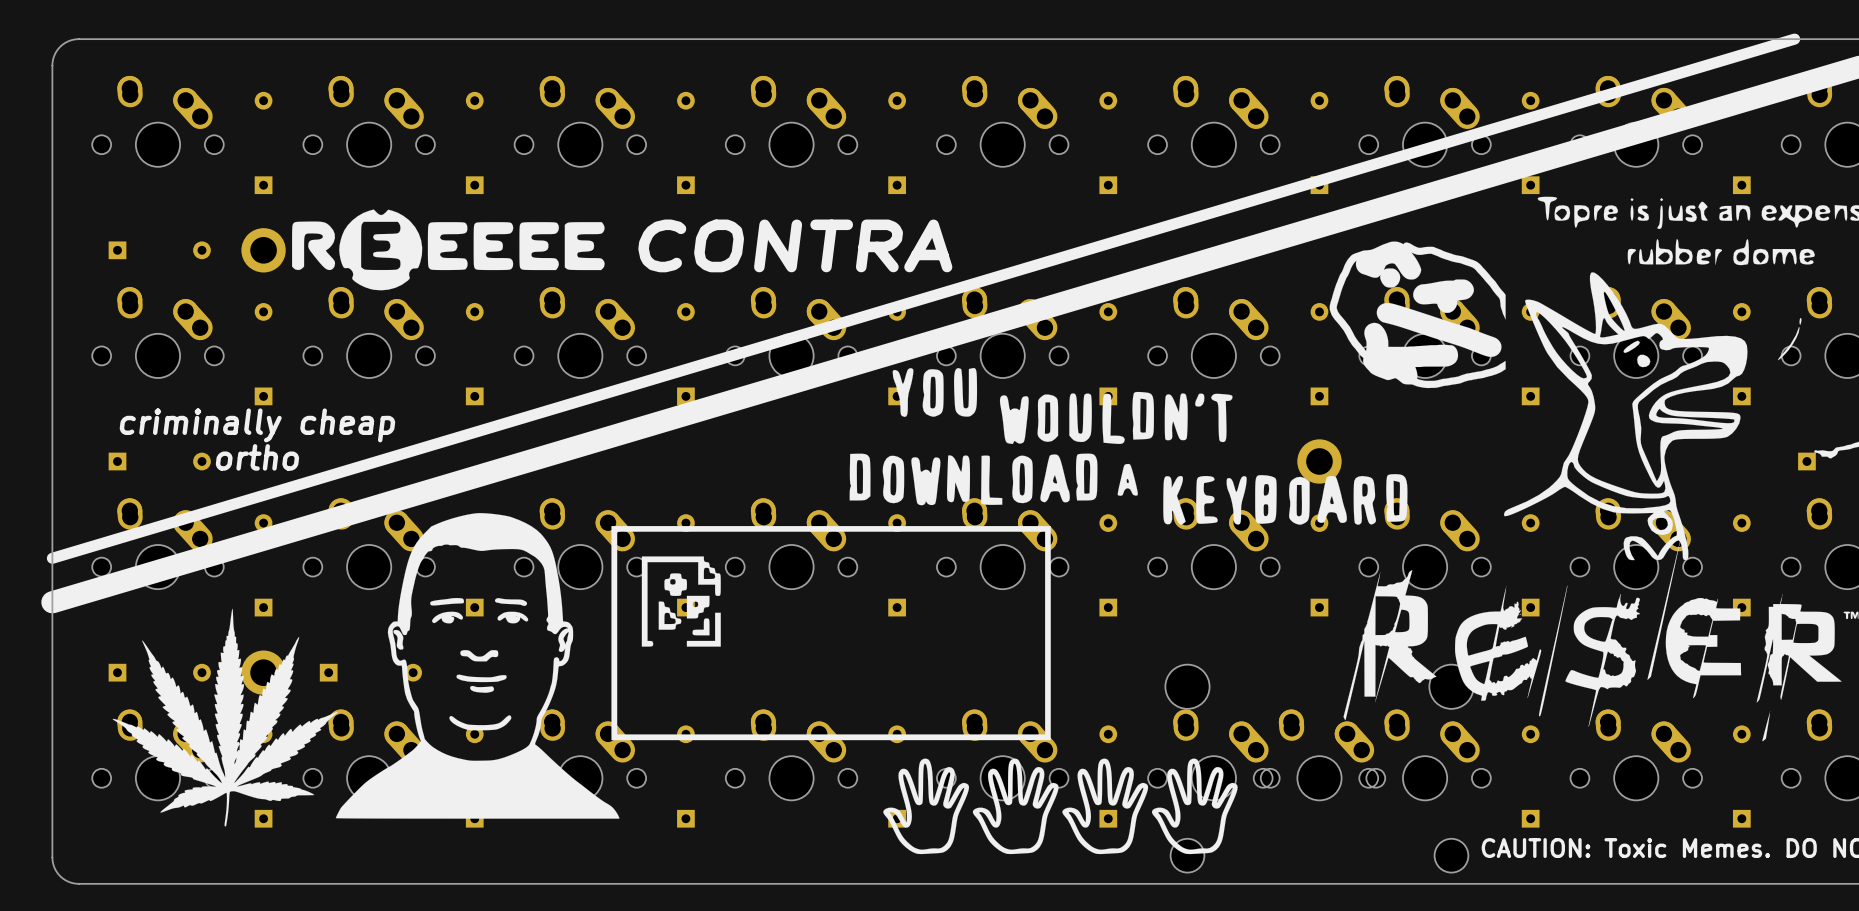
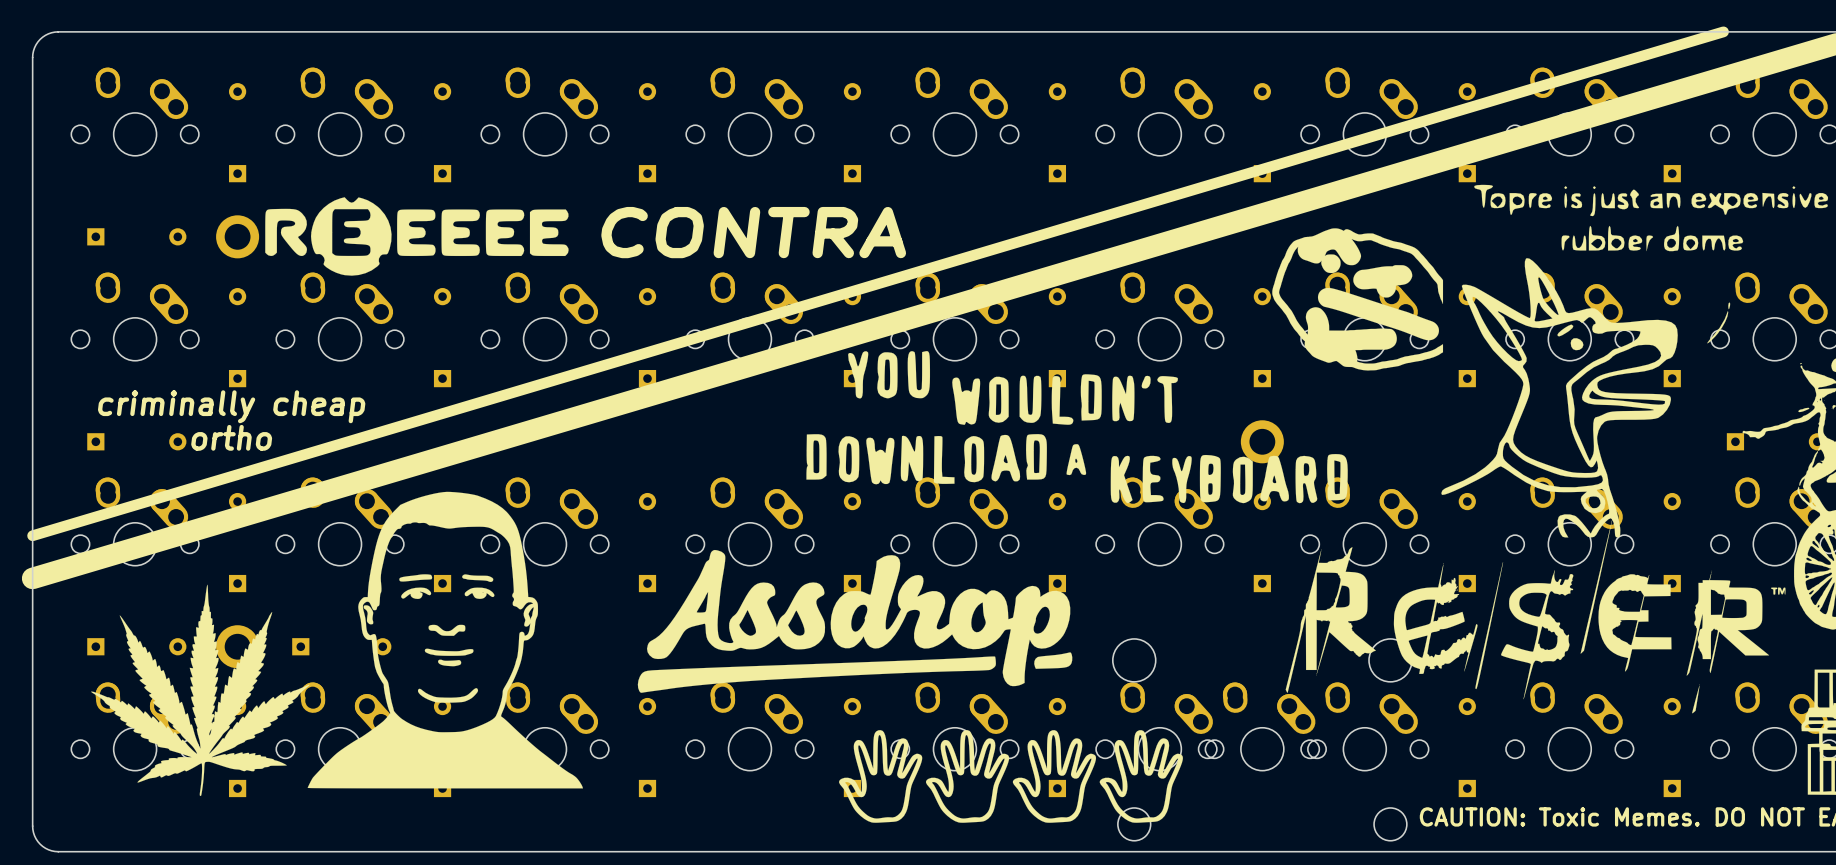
drawing: [611, 526, 1051, 741] -> none
drawing: none -> [637, 549, 1073, 693]

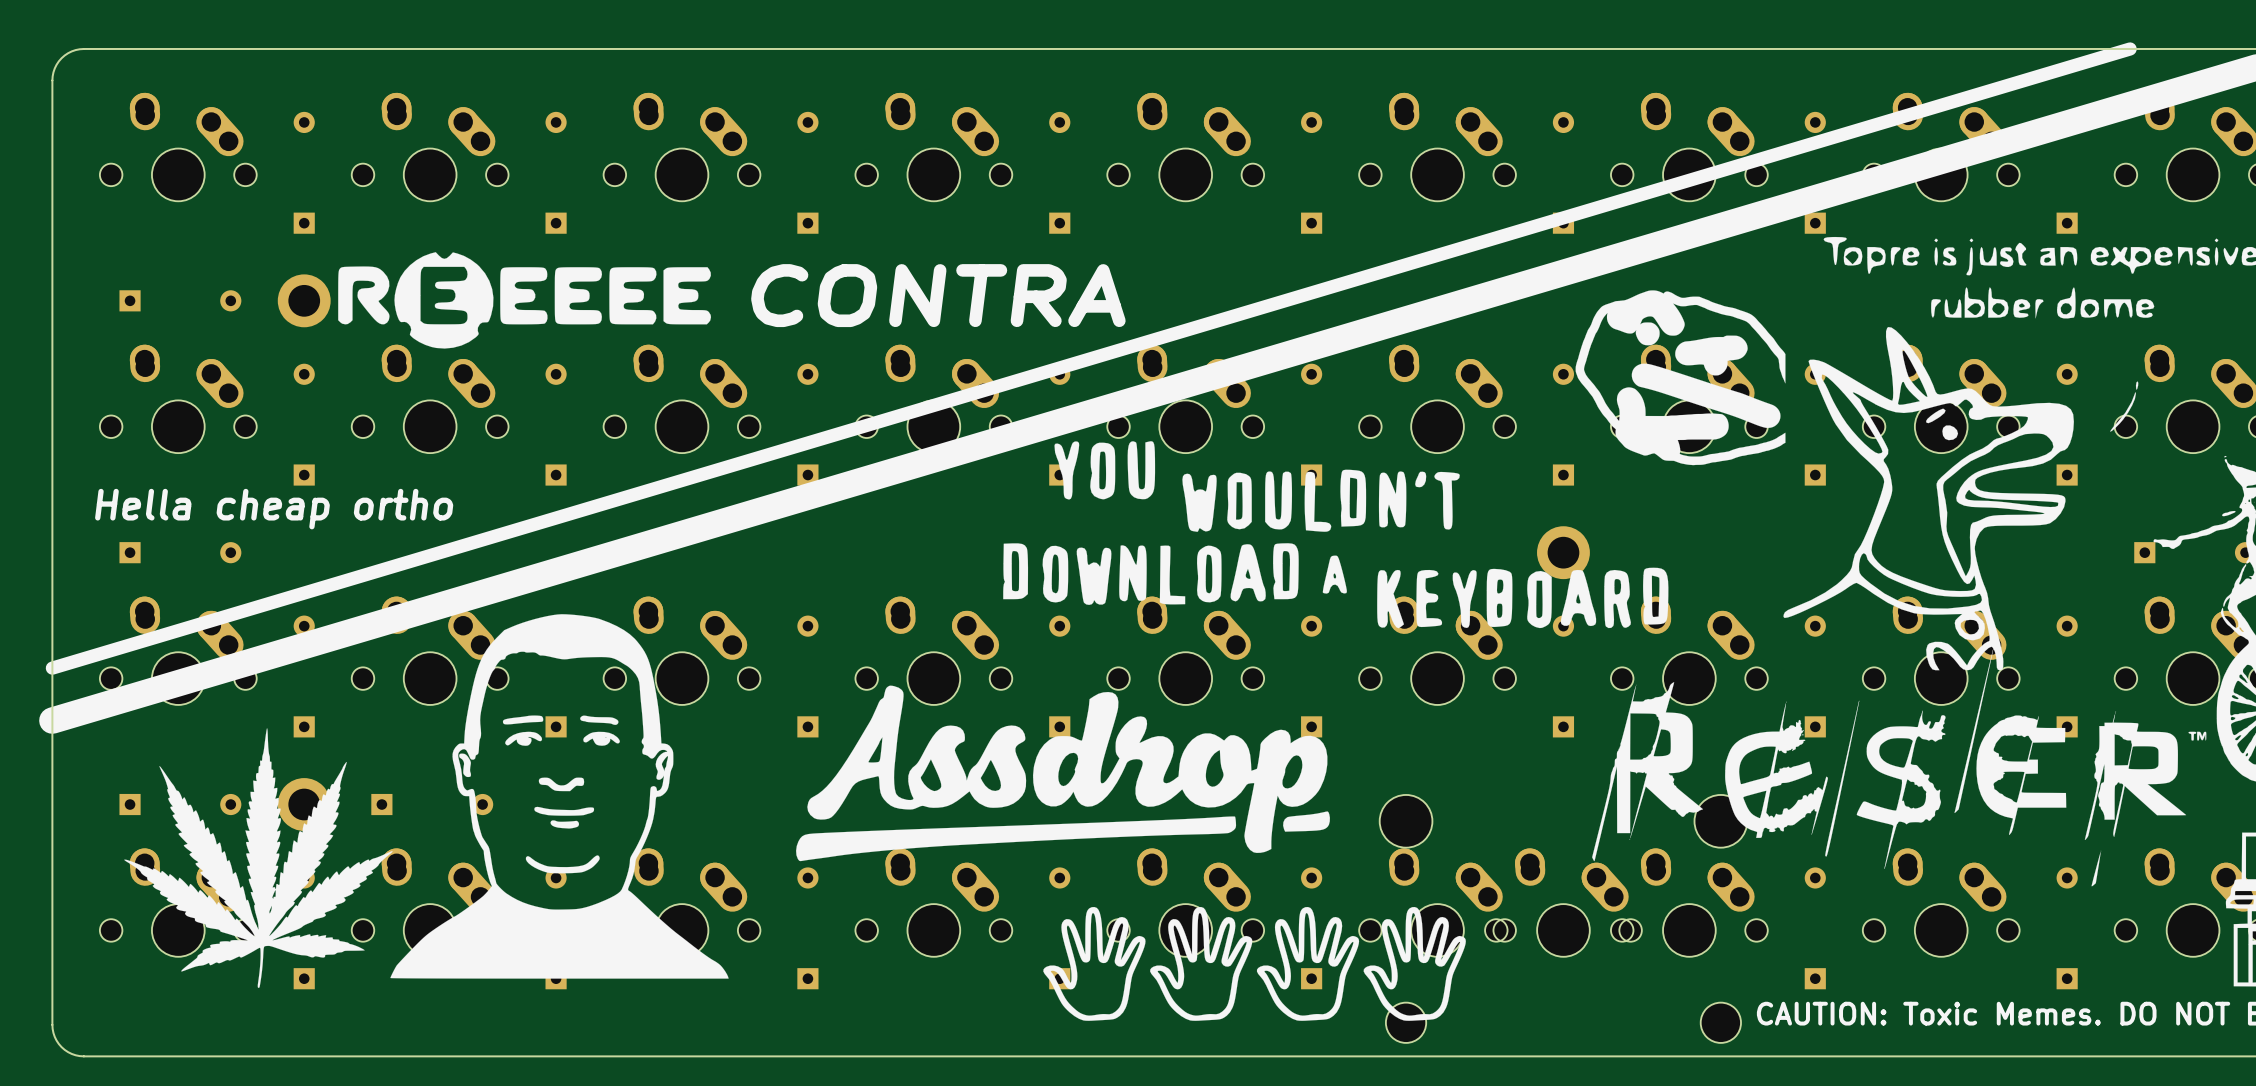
text: none -> Hella cheap ortho (274, 509)
text: criminally cheap (231, 406) -> none
text: ortho (231, 437) -> none

